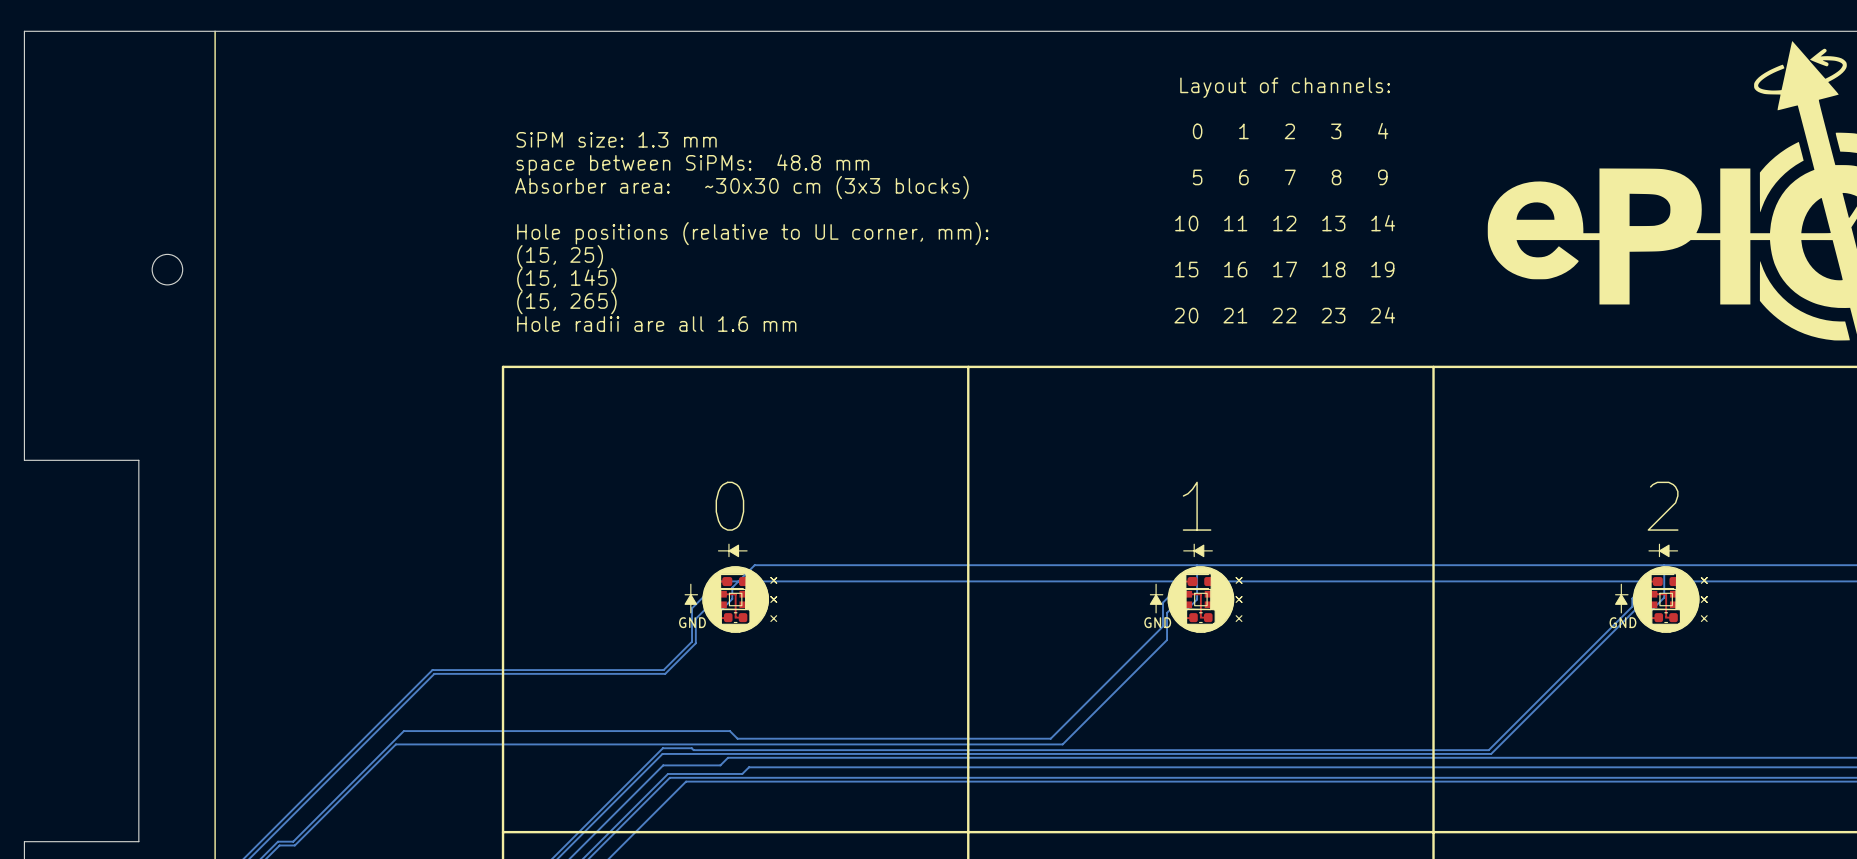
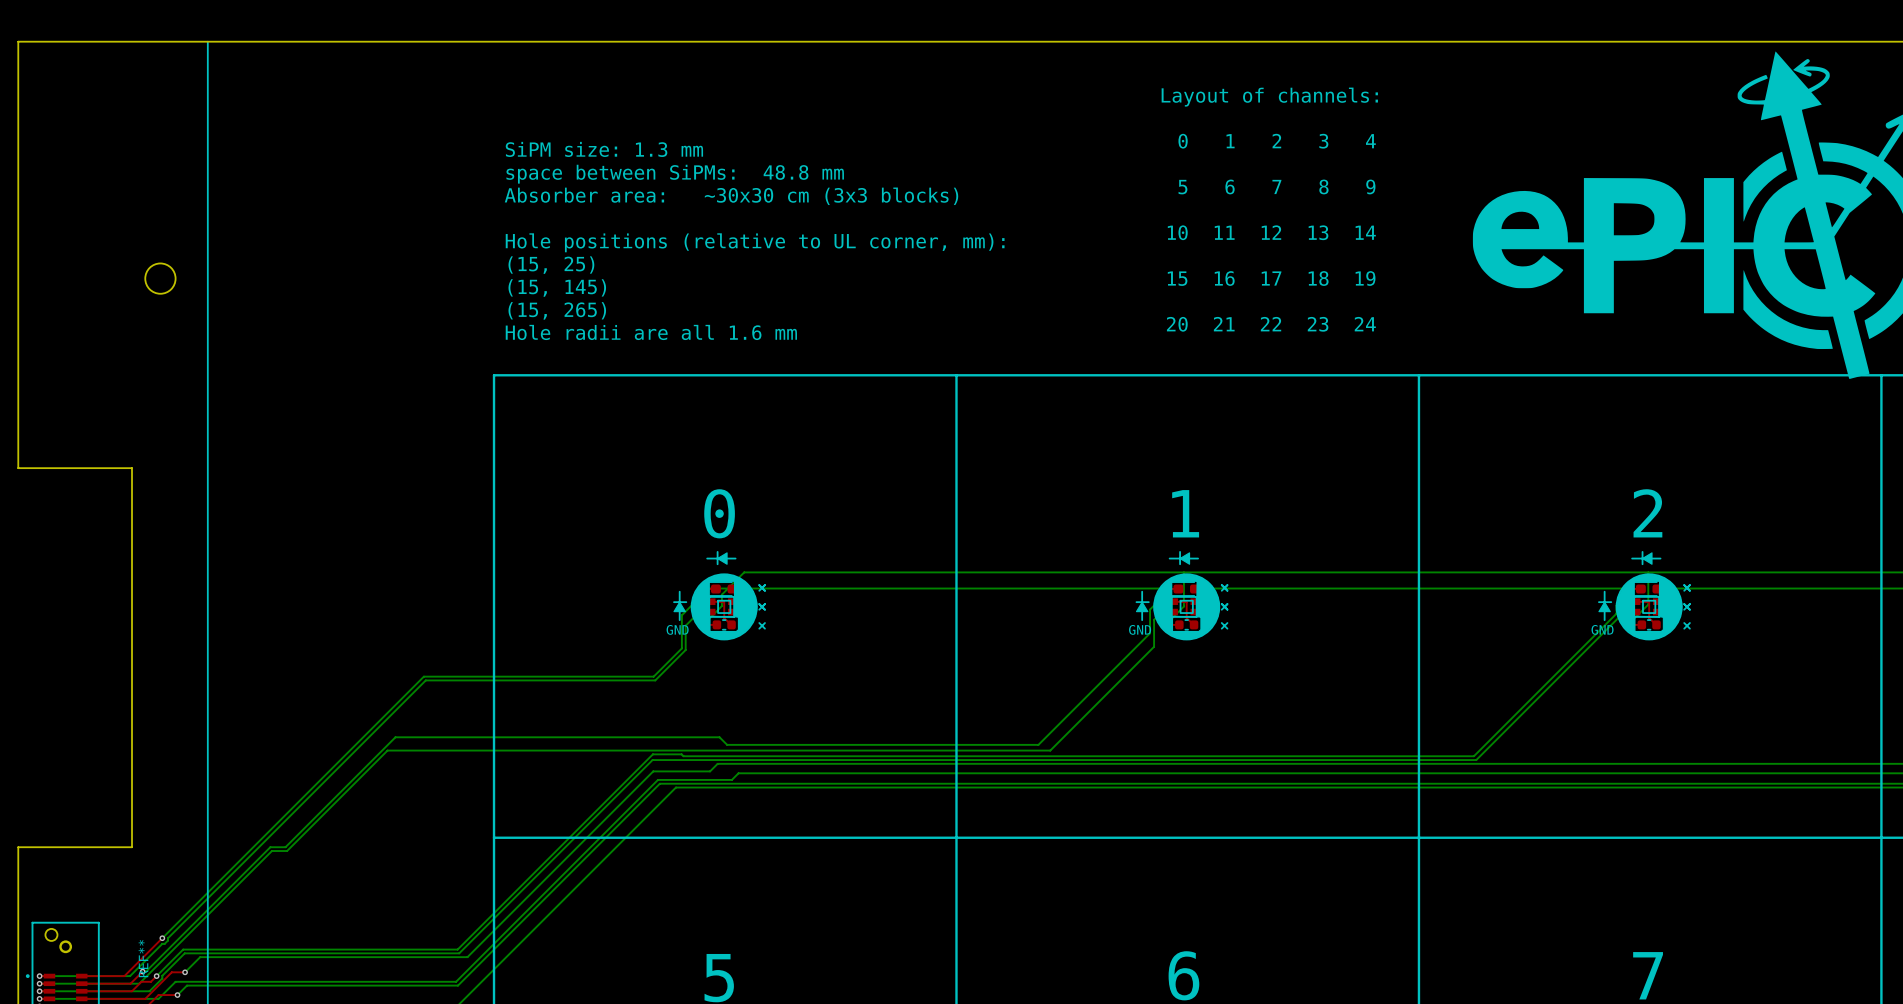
part footprint: [684, 543, 778, 633] -> [673, 551, 766, 641]
part footprint: [1149, 543, 1243, 633] -> [1135, 551, 1229, 641]
part footprint: [1615, 543, 1708, 633] -> [1598, 551, 1691, 641]

